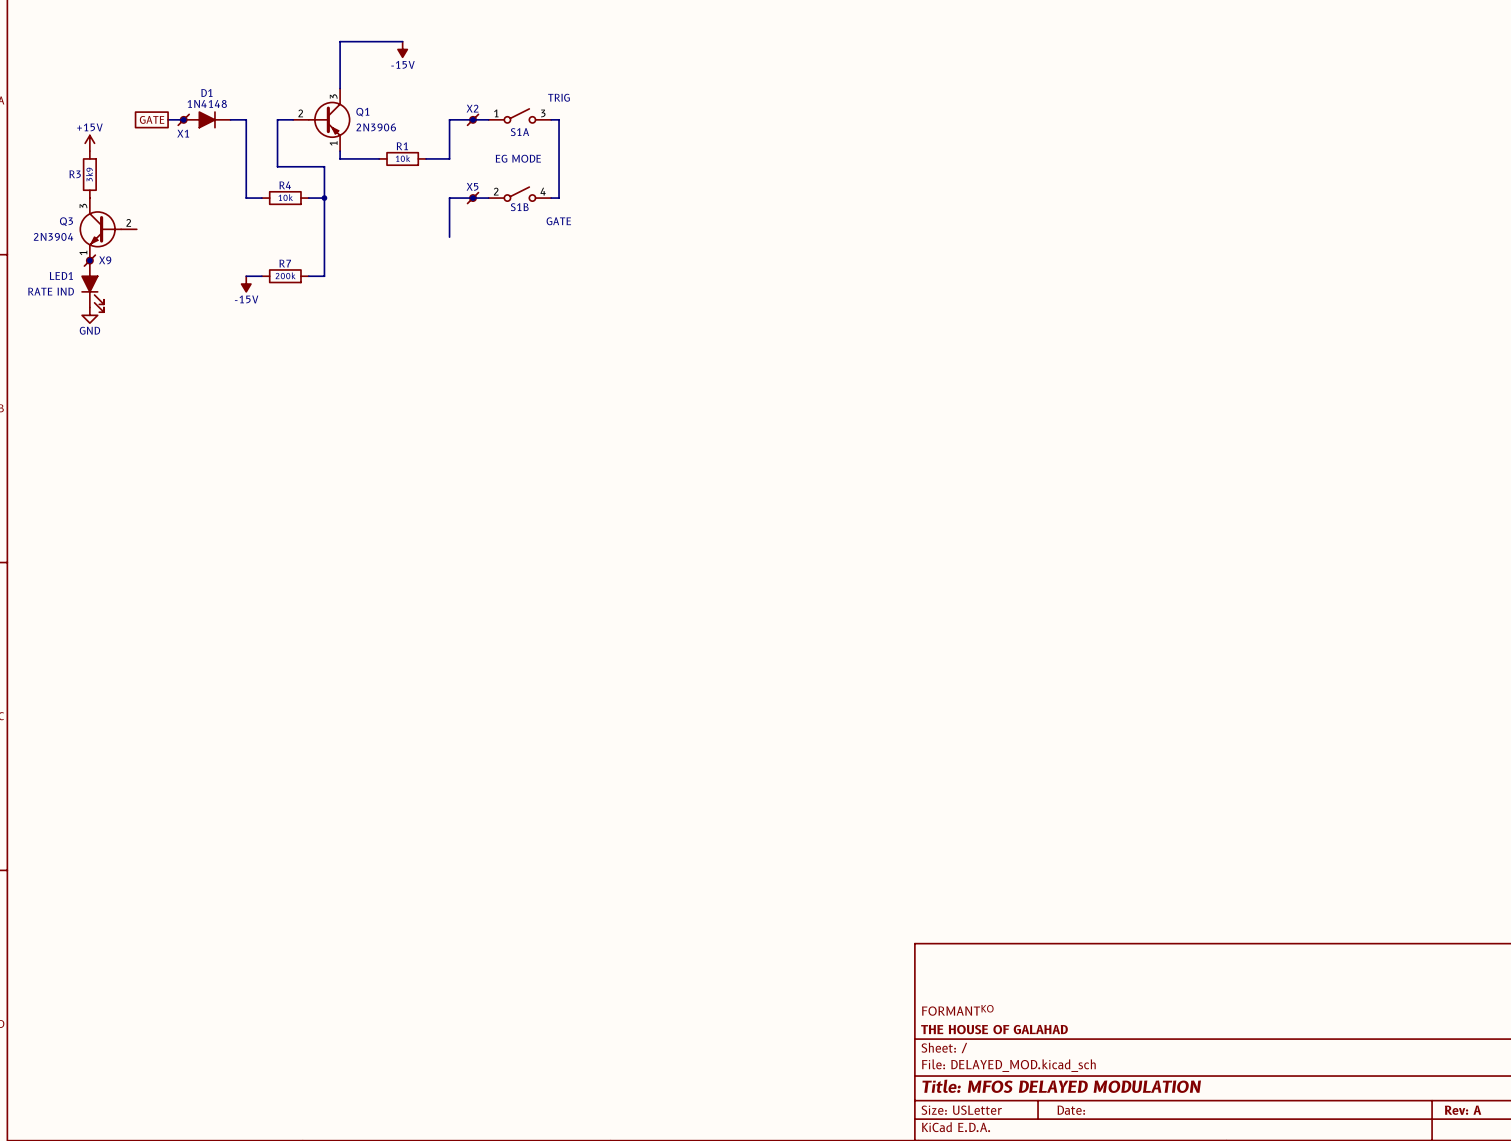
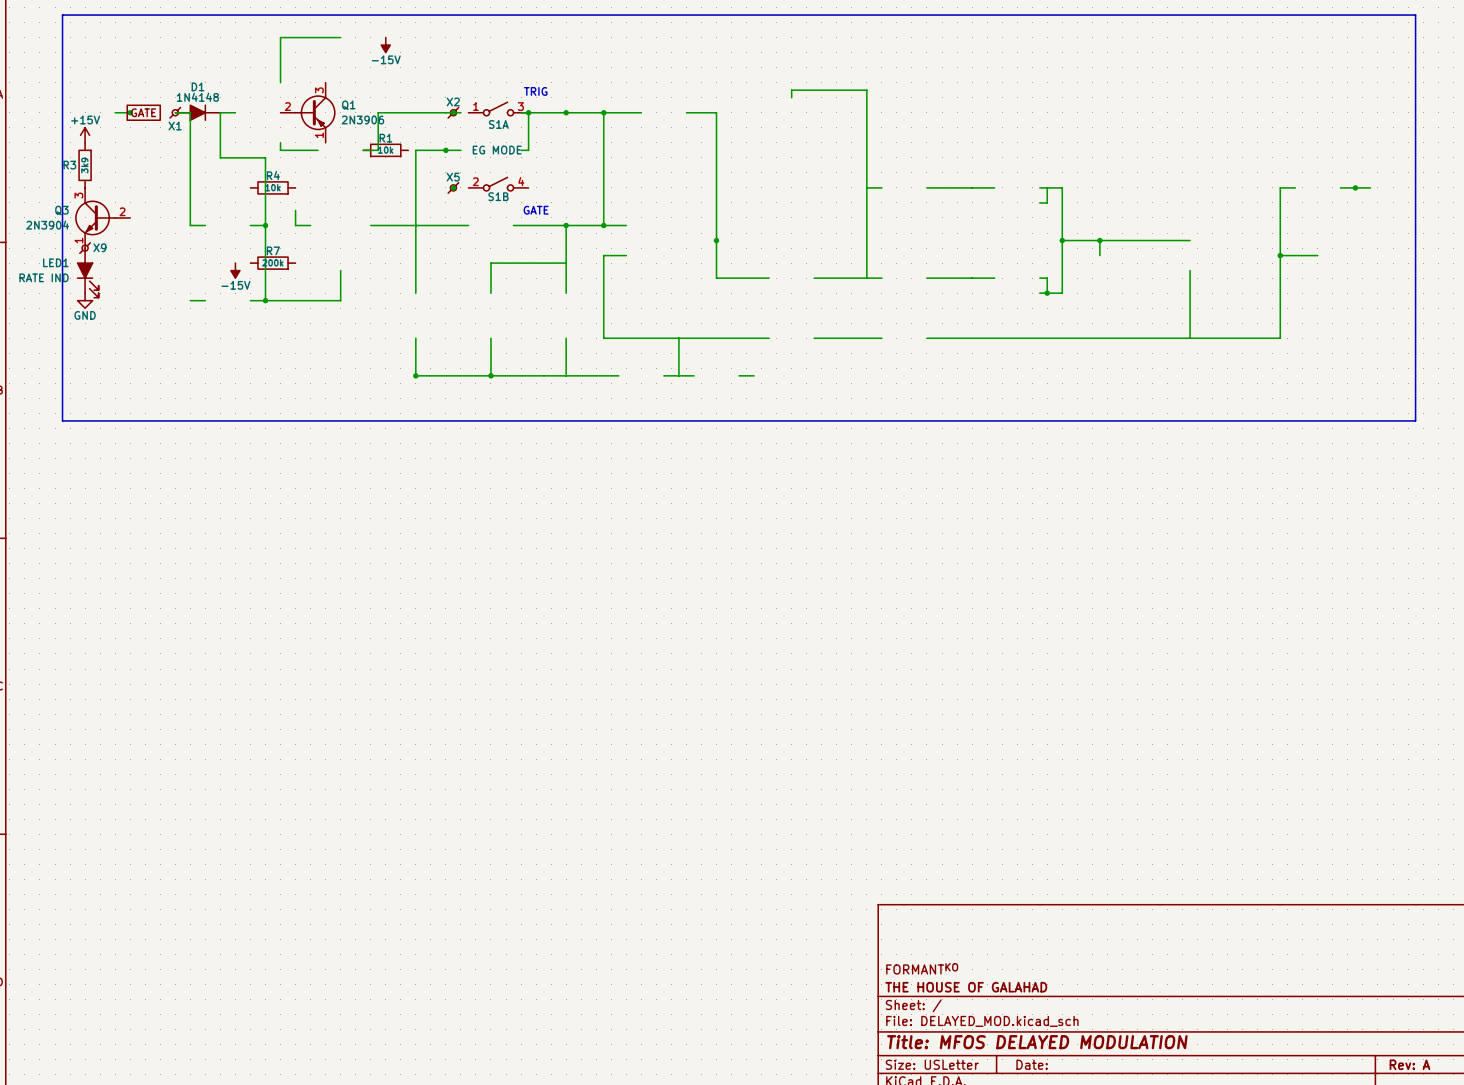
line: none -> (62, 15) (1415, 15) (1415, 420) (62, 420) (62, 15)
wire: (340, 41) (340, 88) -> (325, 37) (280, 37) (280, 82)
wire: (355, 41) (402, 41) -> none
wire: none -> (791, 97) (791, 90) (866, 90) (866, 278)
wire: none -> (115, 112) (130, 112)
junction: none -> (130, 112)
wire: (168, 119) (183, 119) -> (205, 225) (190, 225) (190, 112) (175, 112)
junction: (183, 119) -> none
wire: none -> (220, 112) (220, 157) (265, 157) (265, 300)
wire: (246, 119) (246, 198) (261, 198) -> none
wire: (293, 119) (277, 119) (277, 166) (324, 166) (324, 276) (308, 276) -> none
wire: (449, 119) (449, 158) -> (460, 150) (430, 150)
wire: (480, 119) (488, 119) -> none
wire: none -> (521, 112) (528, 112) (528, 150) (521, 150)
junction: none -> (528, 112)
wire: (559, 119) (559, 198) (551, 198) -> (536, 112) (641, 112)
junction: none -> (566, 112)
wire: none -> (603, 112) (603, 225)
junction: none -> (603, 112)
wire: none -> (686, 112) (716, 112) (716, 278) (769, 278)
wire: none -> (280, 142) (280, 150) (318, 150)
wire: (340, 151) (340, 158) (379, 158) -> (430, 112) (378, 112) (378, 150) (363, 150)
wire: (426, 158) (433, 158) -> (415, 293) (415, 150)
junction: none -> (445, 150)
wire: (308, 198) (324, 198) -> (250, 225) (265, 225)
junction: (324, 198) -> none
wire: (488, 198) (449, 198) (449, 237) -> none
wire: none -> (866, 187) (881, 187)
wire: none -> (926, 187) (994, 187)
wire: none -> (1039, 187) (1062, 187) (1062, 293) (1039, 293)
wire: none -> (1047, 187) (1047, 202) (1039, 202)
wire: none -> (1295, 187) (1280, 187) (1280, 338) (926, 338)
wire: none -> (1340, 187) (1370, 187)
junction: none -> (1355, 187)
wire: none -> (295, 210) (295, 225) (310, 225)
junction: none -> (265, 225)
wire: none -> (370, 225) (468, 225)
wire: none -> (513, 225) (626, 225)
wire: none -> (566, 225) (566, 293)
junction: none -> (566, 225)
junction: none -> (603, 225)
junction: none -> (716, 240)
wire: none -> (1062, 240) (1190, 240)
junction: none -> (1062, 240)
wire: none -> (1099, 240) (1099, 255)
junction: none -> (1099, 240)
junction: (89, 260) -> none
wire: none -> (626, 255) (603, 255) (603, 338) (769, 338)
wire: none -> (1280, 255) (1317, 255)
junction: none -> (1280, 255)
wire: (246, 276) (261, 276) -> (190, 300) (205, 300)
wire: none -> (566, 263) (490, 263) (490, 293)
wire: none -> (340, 270) (340, 300) (250, 300)
wire: none -> (1190, 270) (1190, 338)
wire: none -> (814, 278) (881, 278)
wire: none -> (926, 278) (994, 278)
wire: none -> (1039, 278) (1047, 278) (1047, 293)
junction: none -> (1047, 293)
junction: none -> (265, 300)
wire: none -> (415, 338) (415, 375) (618, 375)
wire: none -> (490, 338) (490, 375)
wire: none -> (566, 338) (566, 375)
wire: none -> (678, 338) (678, 375)
wire: none -> (814, 338) (881, 338)
junction: none -> (415, 375)
junction: none -> (490, 375)
wire: none -> (663, 375) (693, 375)
wire: none -> (739, 375) (754, 375)

